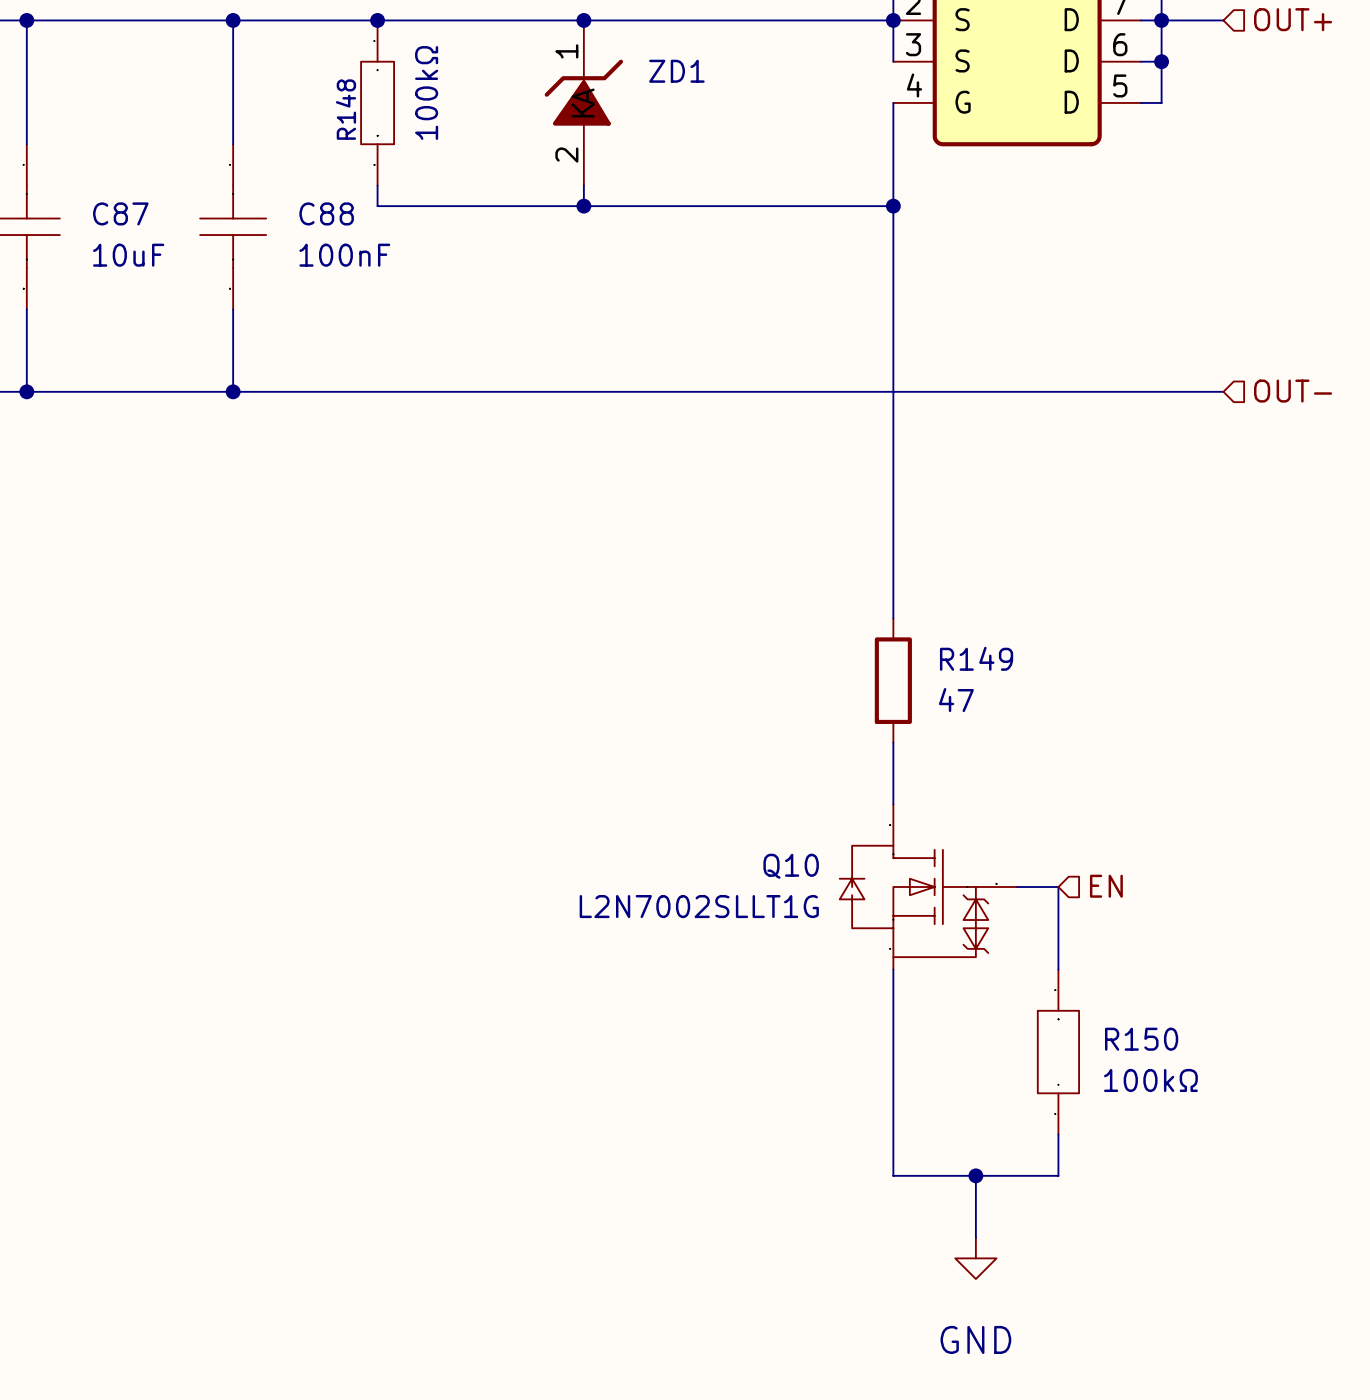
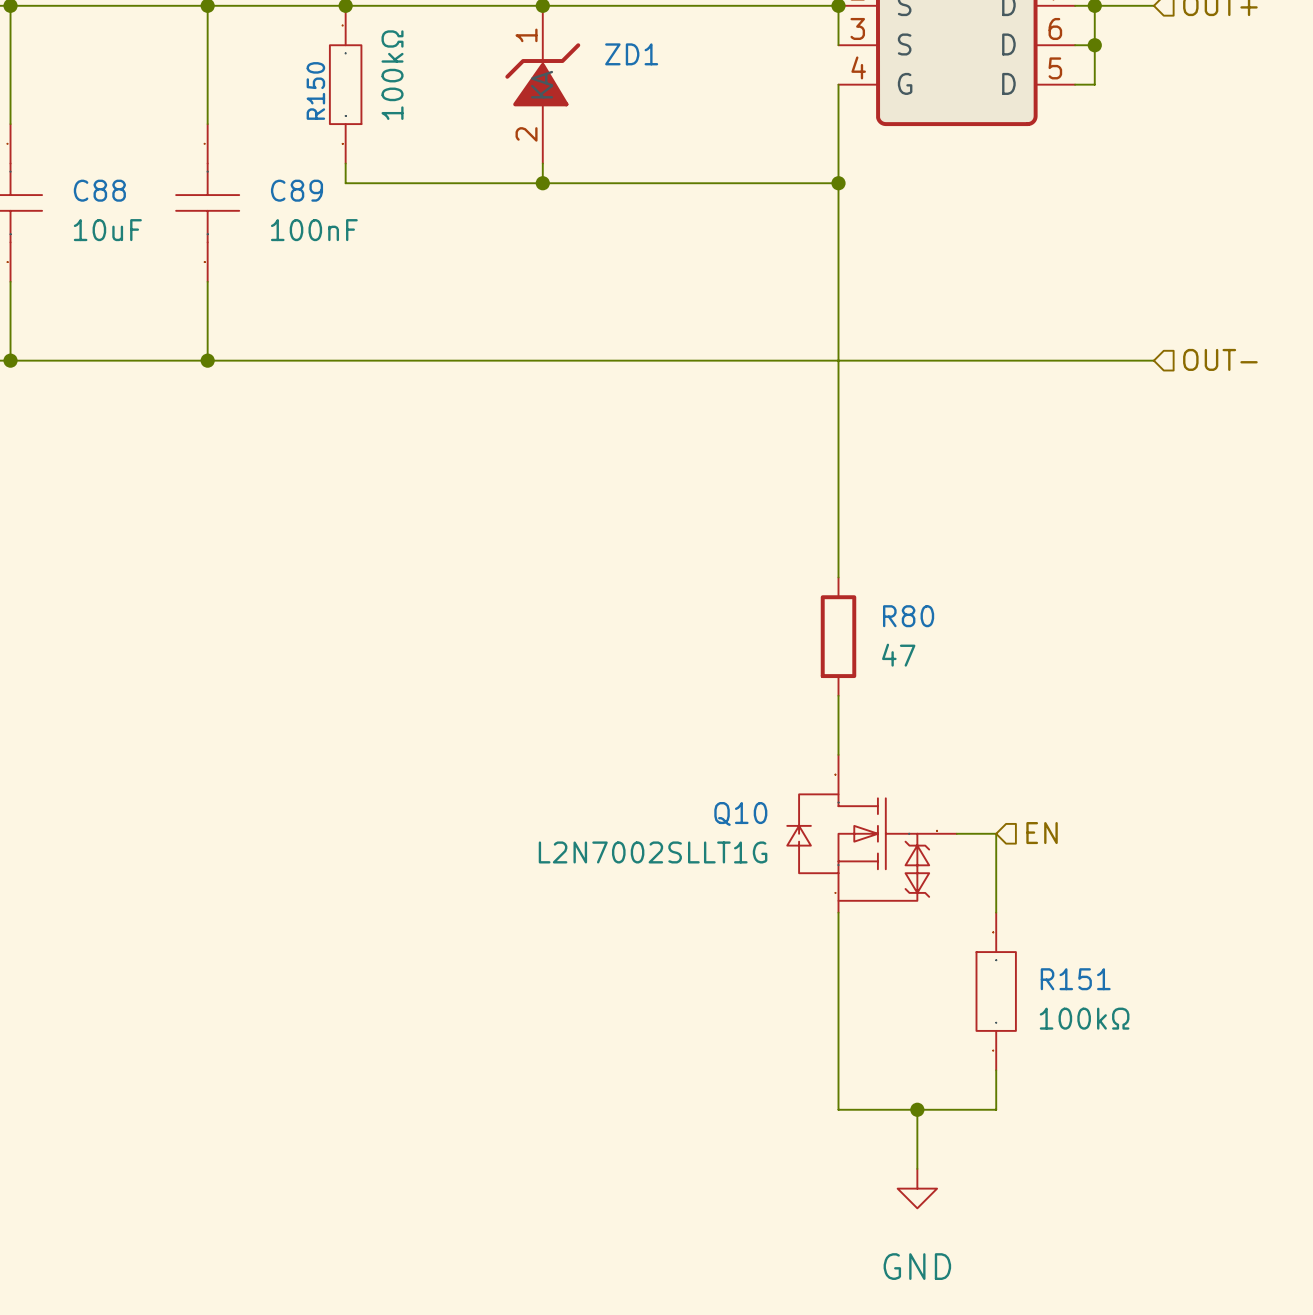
R148 name: R148 (346, 109) -> R150 (315, 90)
C87 name: C87 (120, 213) -> C88 (99, 190)
C88 name: C88 (326, 213) -> C89 (296, 190)
R149 name: R149 (976, 658) -> R80 (908, 616)
R150 name: R150 (1141, 1039) -> R151 (1075, 979)

